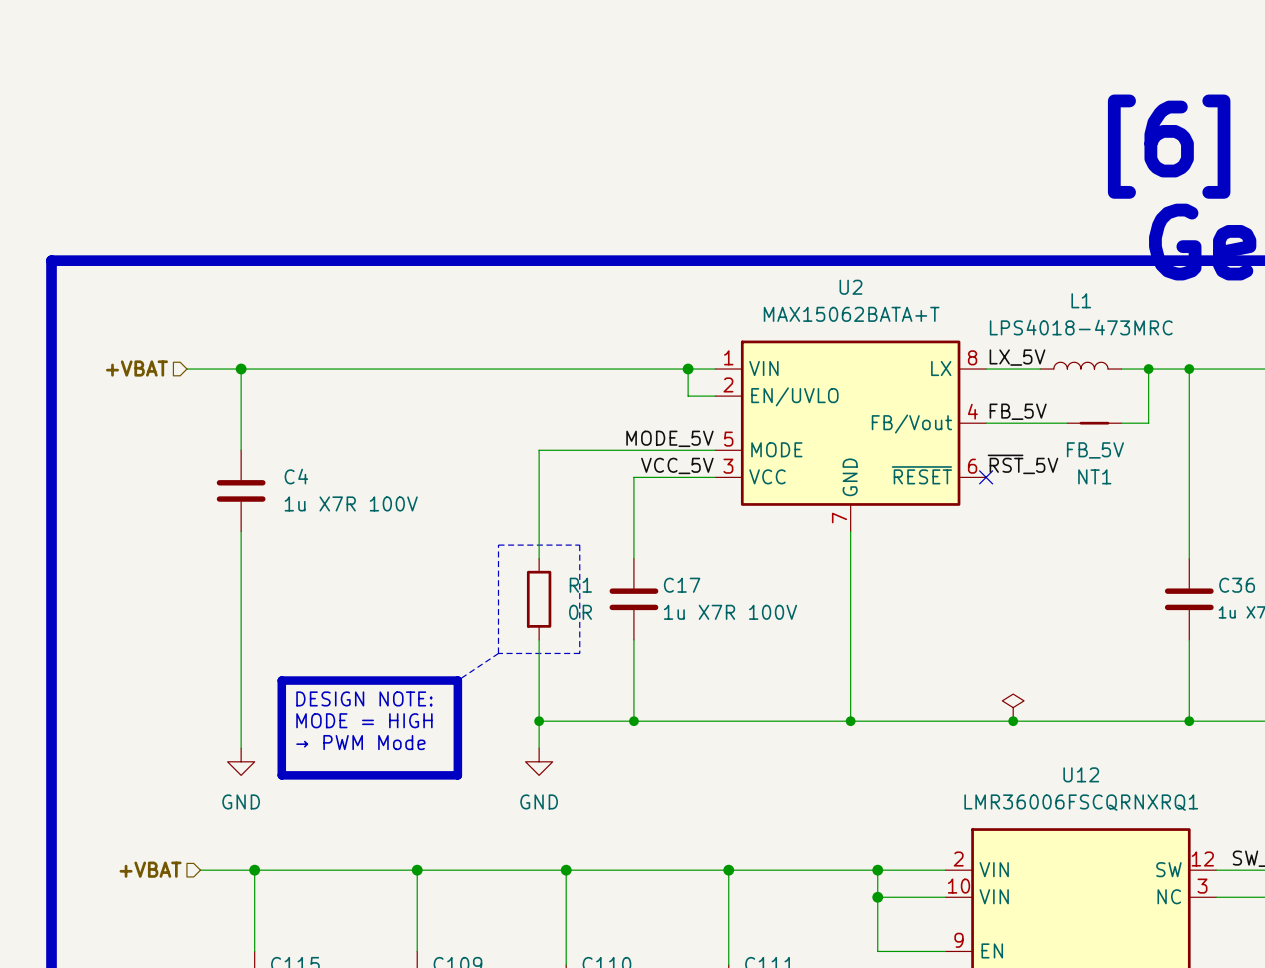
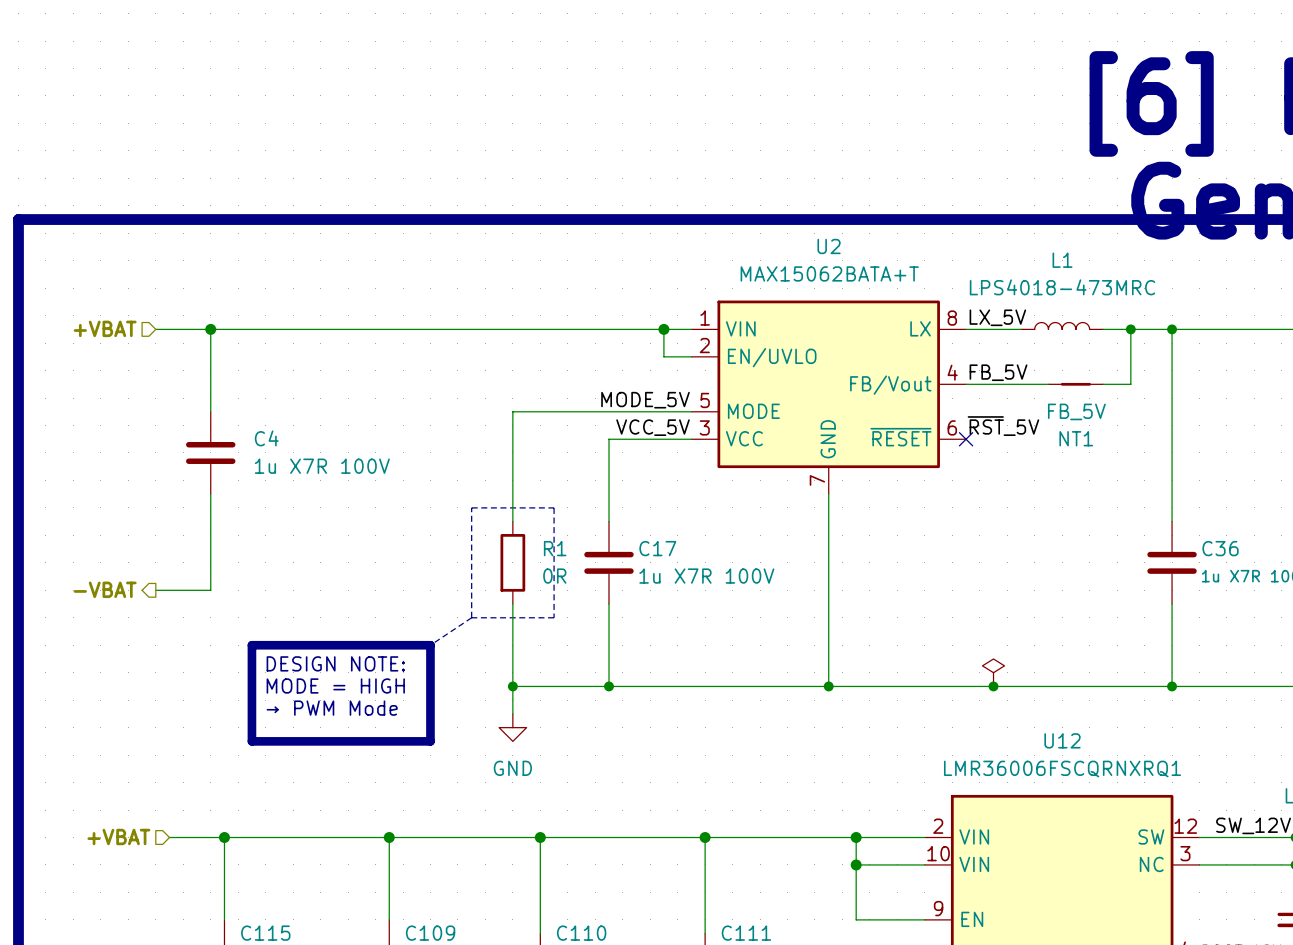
hierarchical label: none -> -VBAT (105, 589)
wire: (241, 626) (241, 748) -> (210, 590) (155, 590)
power symbol: GND (241, 761) -> none

